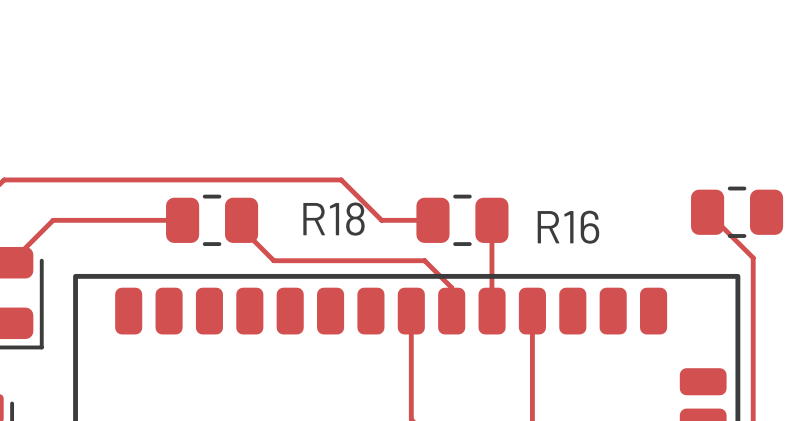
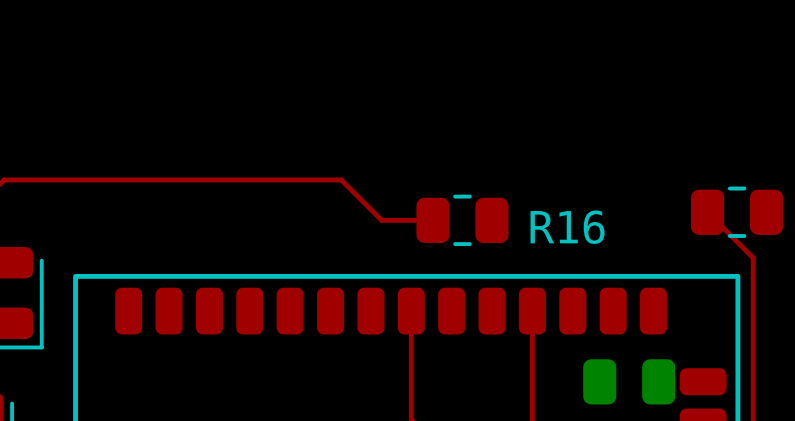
top track: (182, 220) (53, 220) (10, 262) -> none
R18 side: top (212, 220) -> bottom (629, 381)
top track: (491, 220) (491, 310) -> none
top track: (241, 228) (273, 260) (424, 260) (451, 287) (451, 311) -> none

